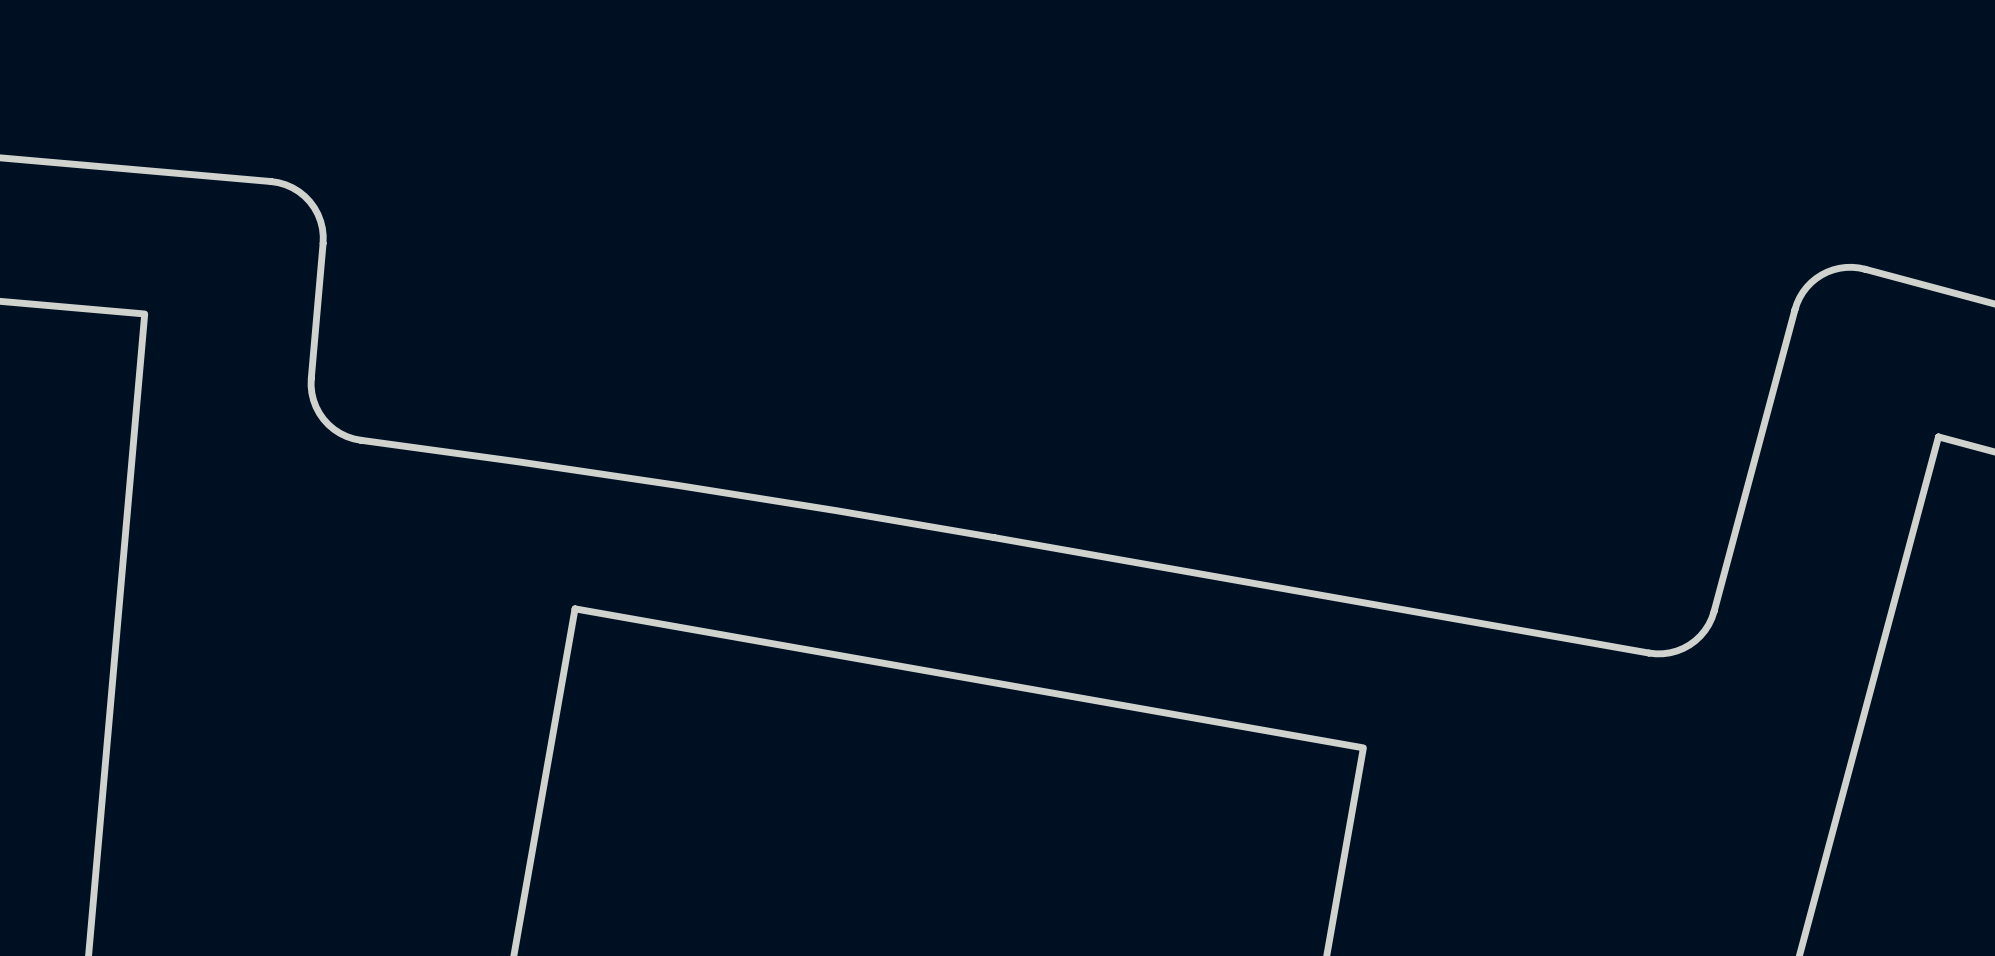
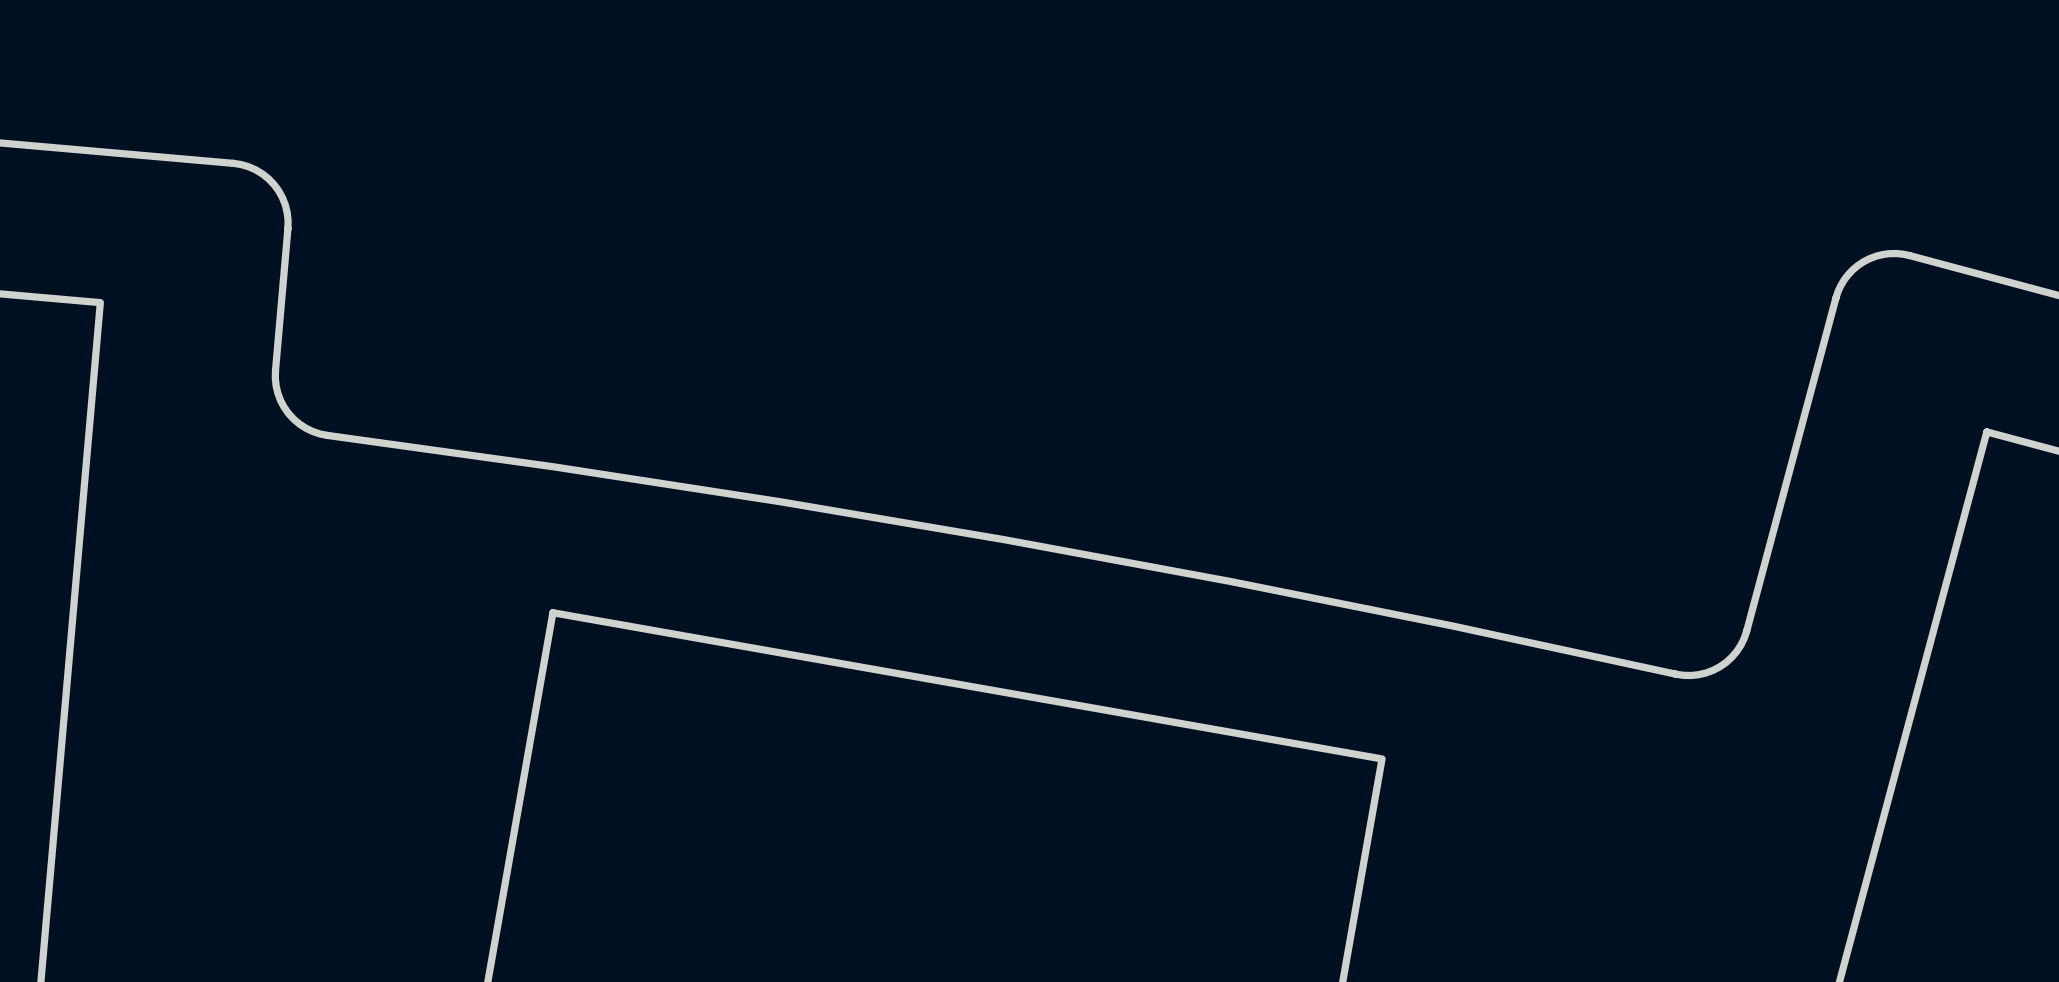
board edge: (360, 440) (677, 485) (836, 510) (1648, 653) (1670, 652) (1689, 644) (1704, 630) (1714, 611) -> (327, 435) (553, 466) (779, 501) (1004, 539) (1228, 581) (1452, 625) (1683, 675) (1705, 673) (1726, 662) (1740, 645) (1750, 615)

